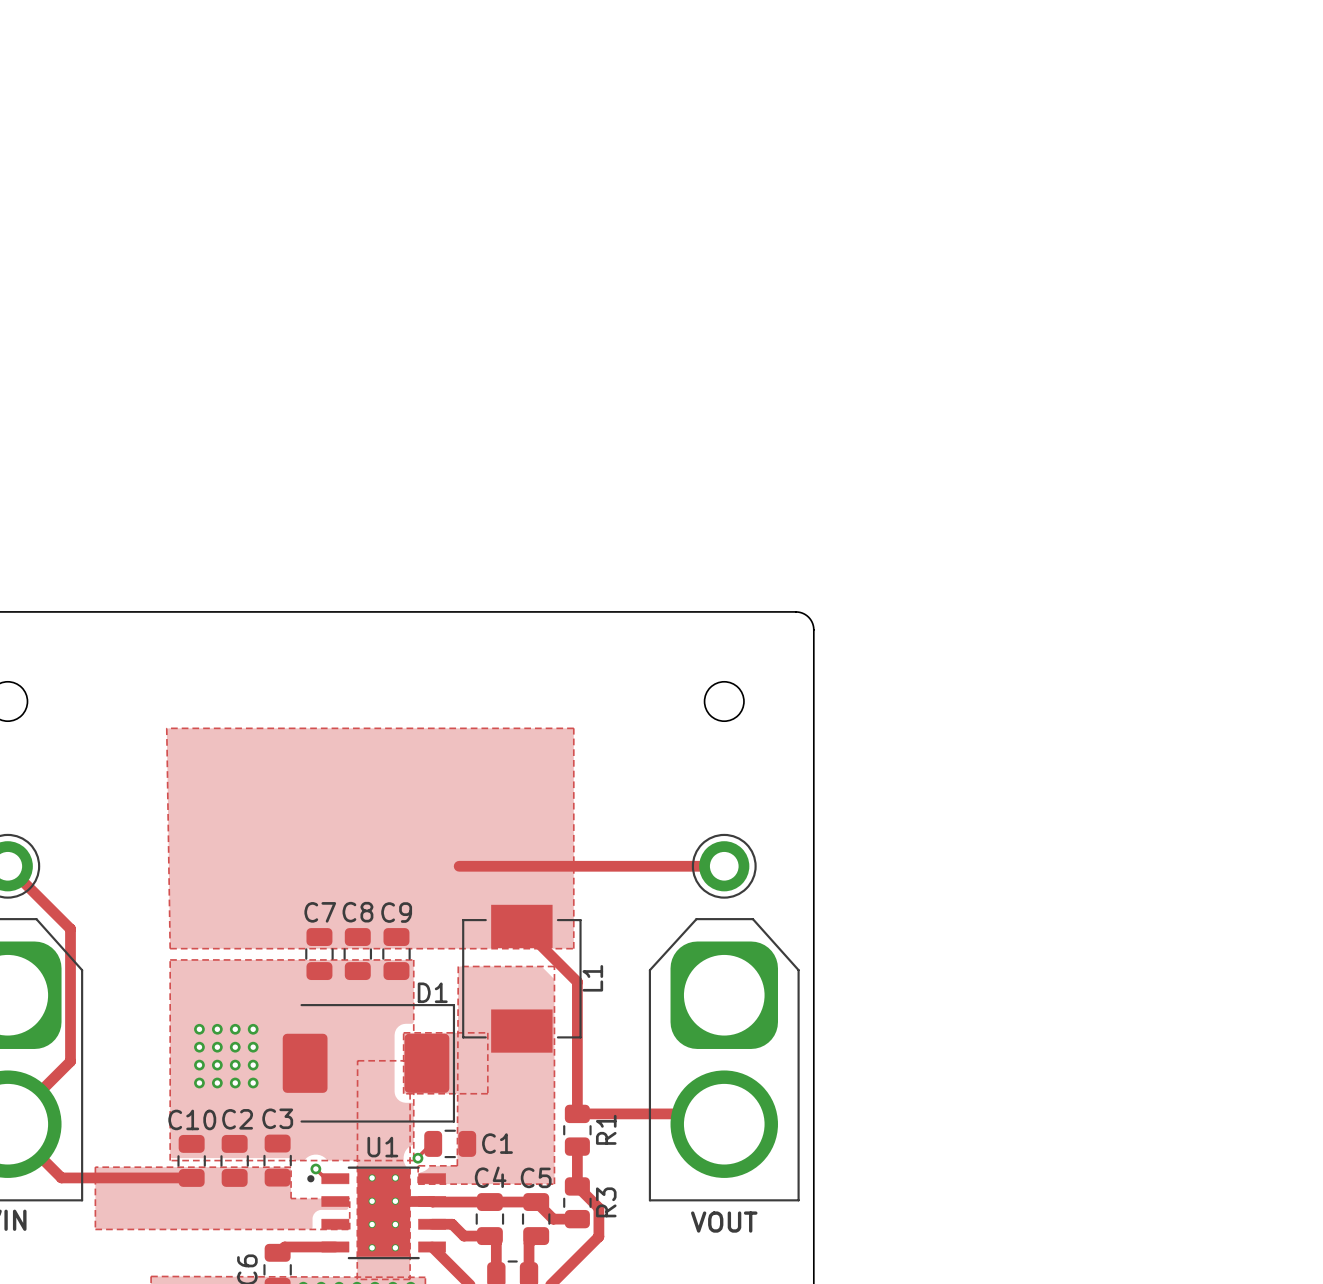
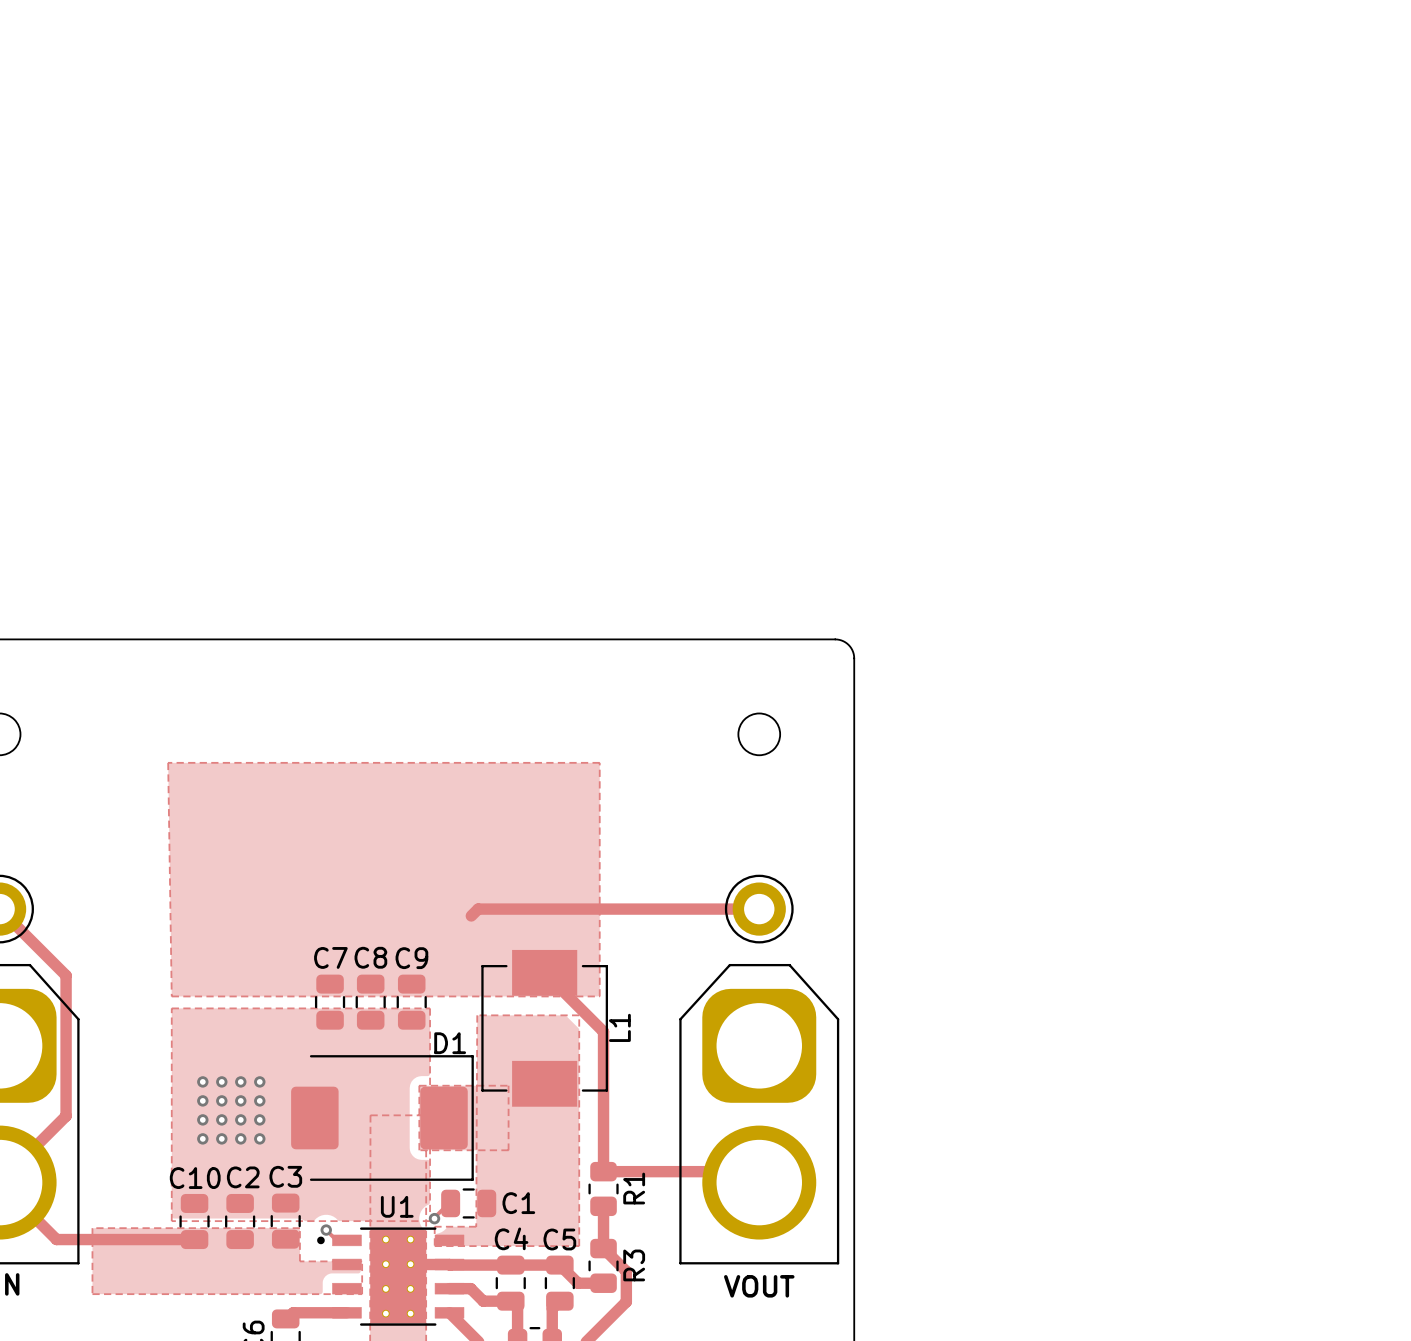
track: none -> (478, 909) (471, 915)

